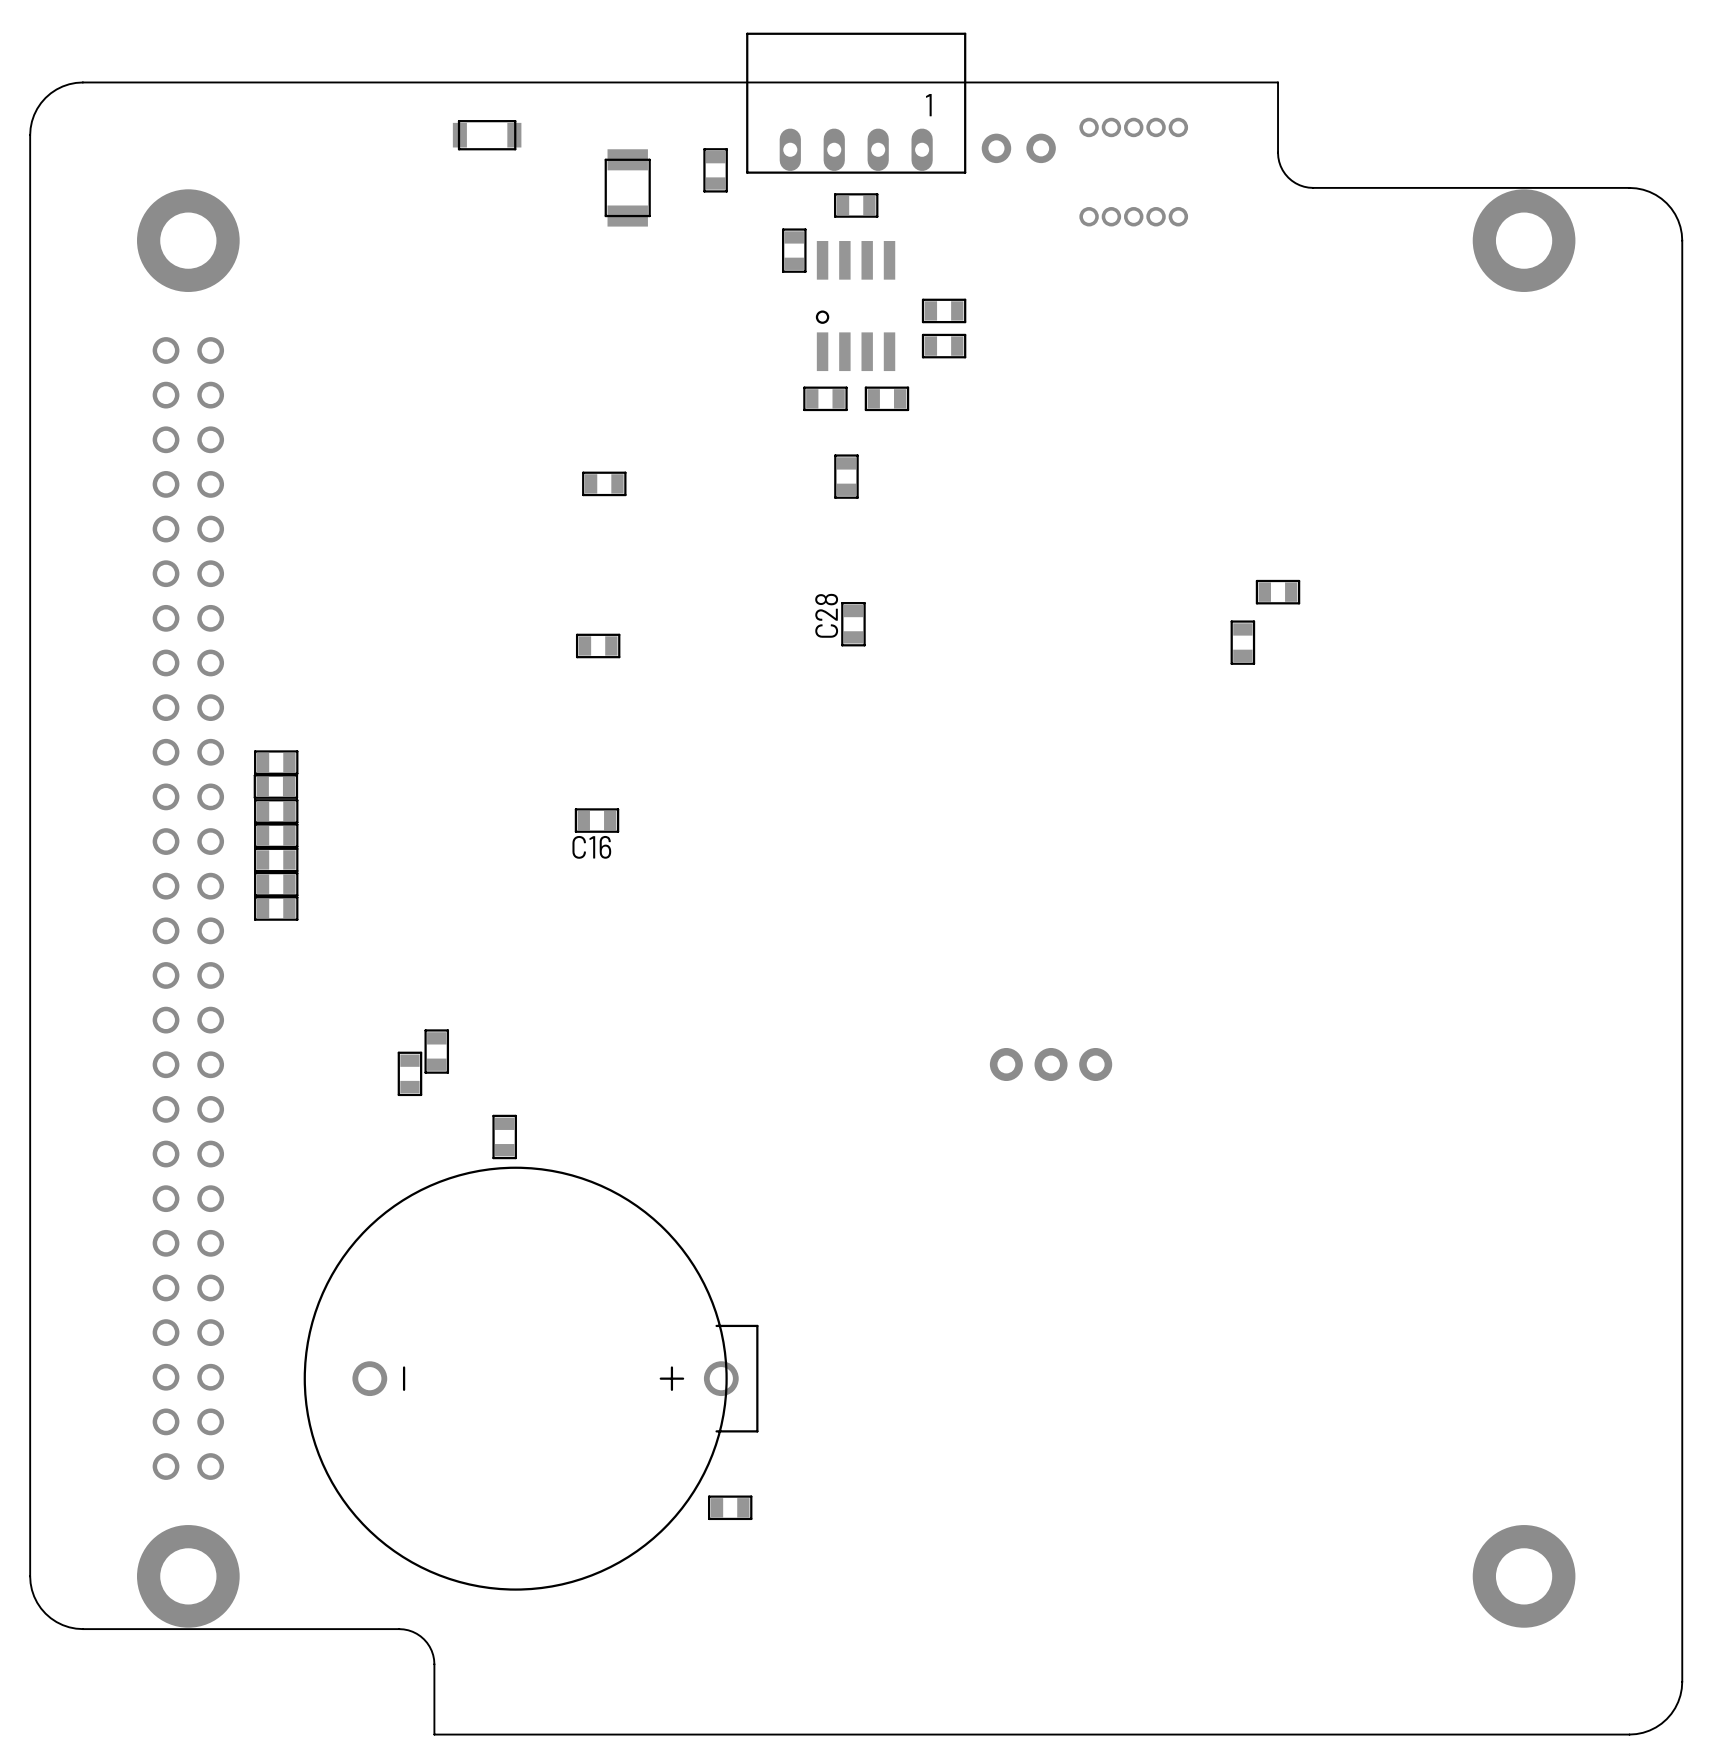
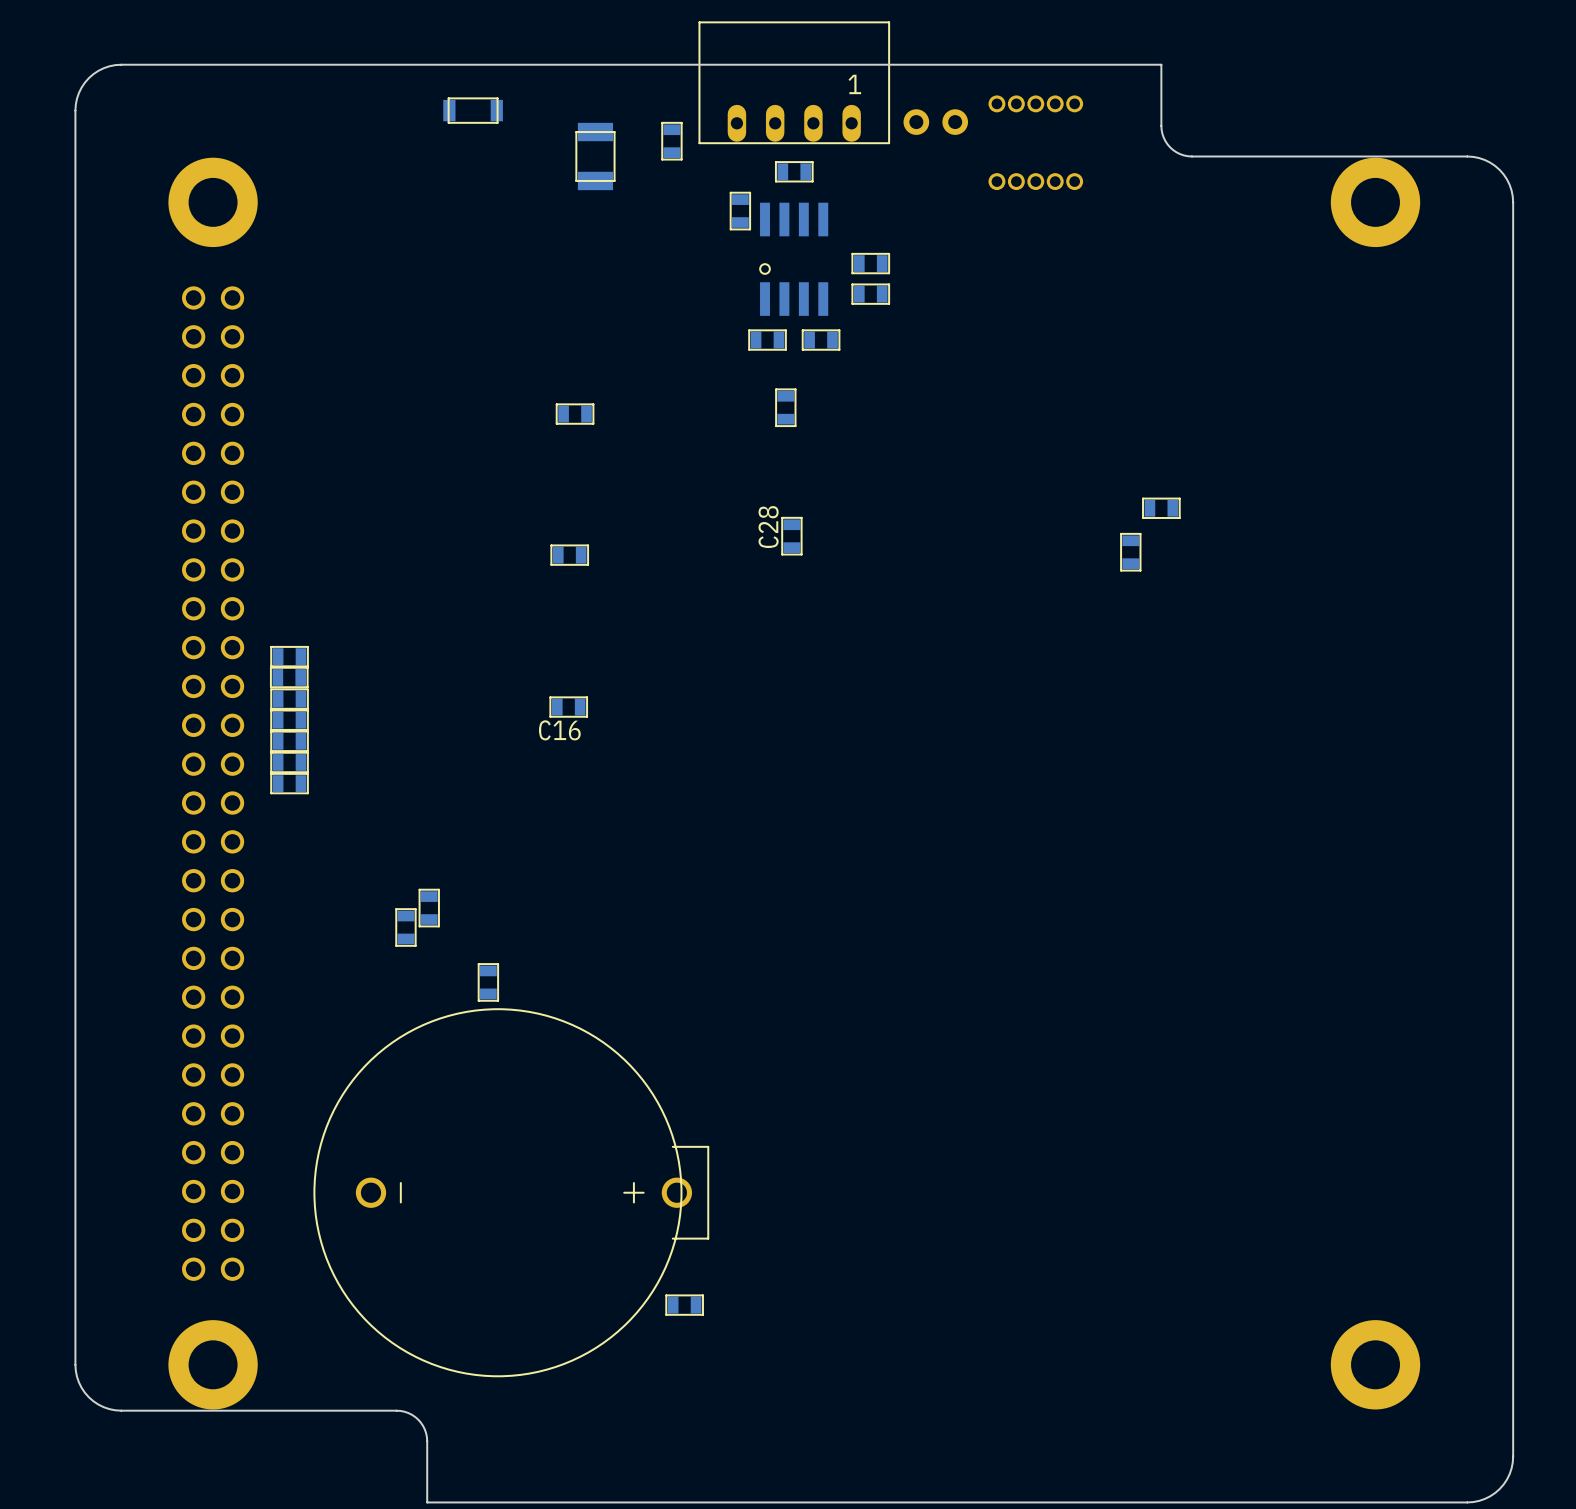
part: (1051, 1064) -> none

